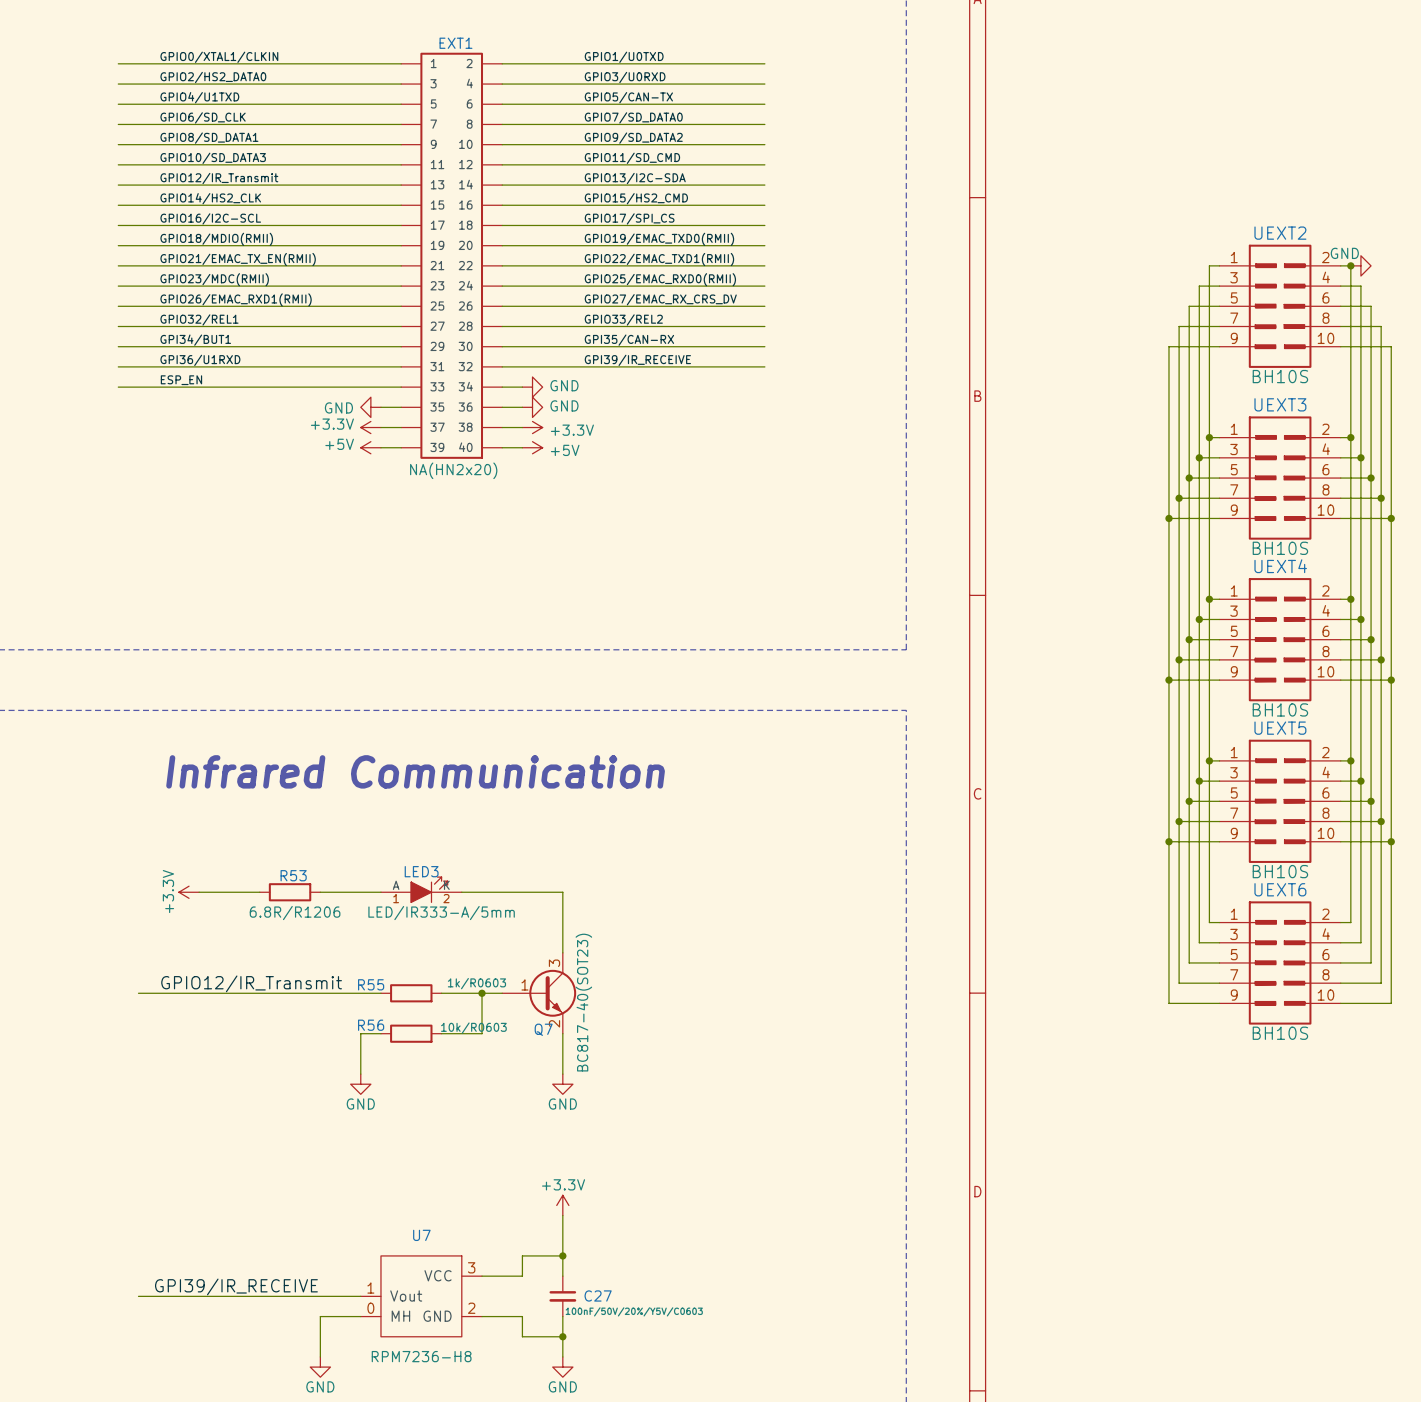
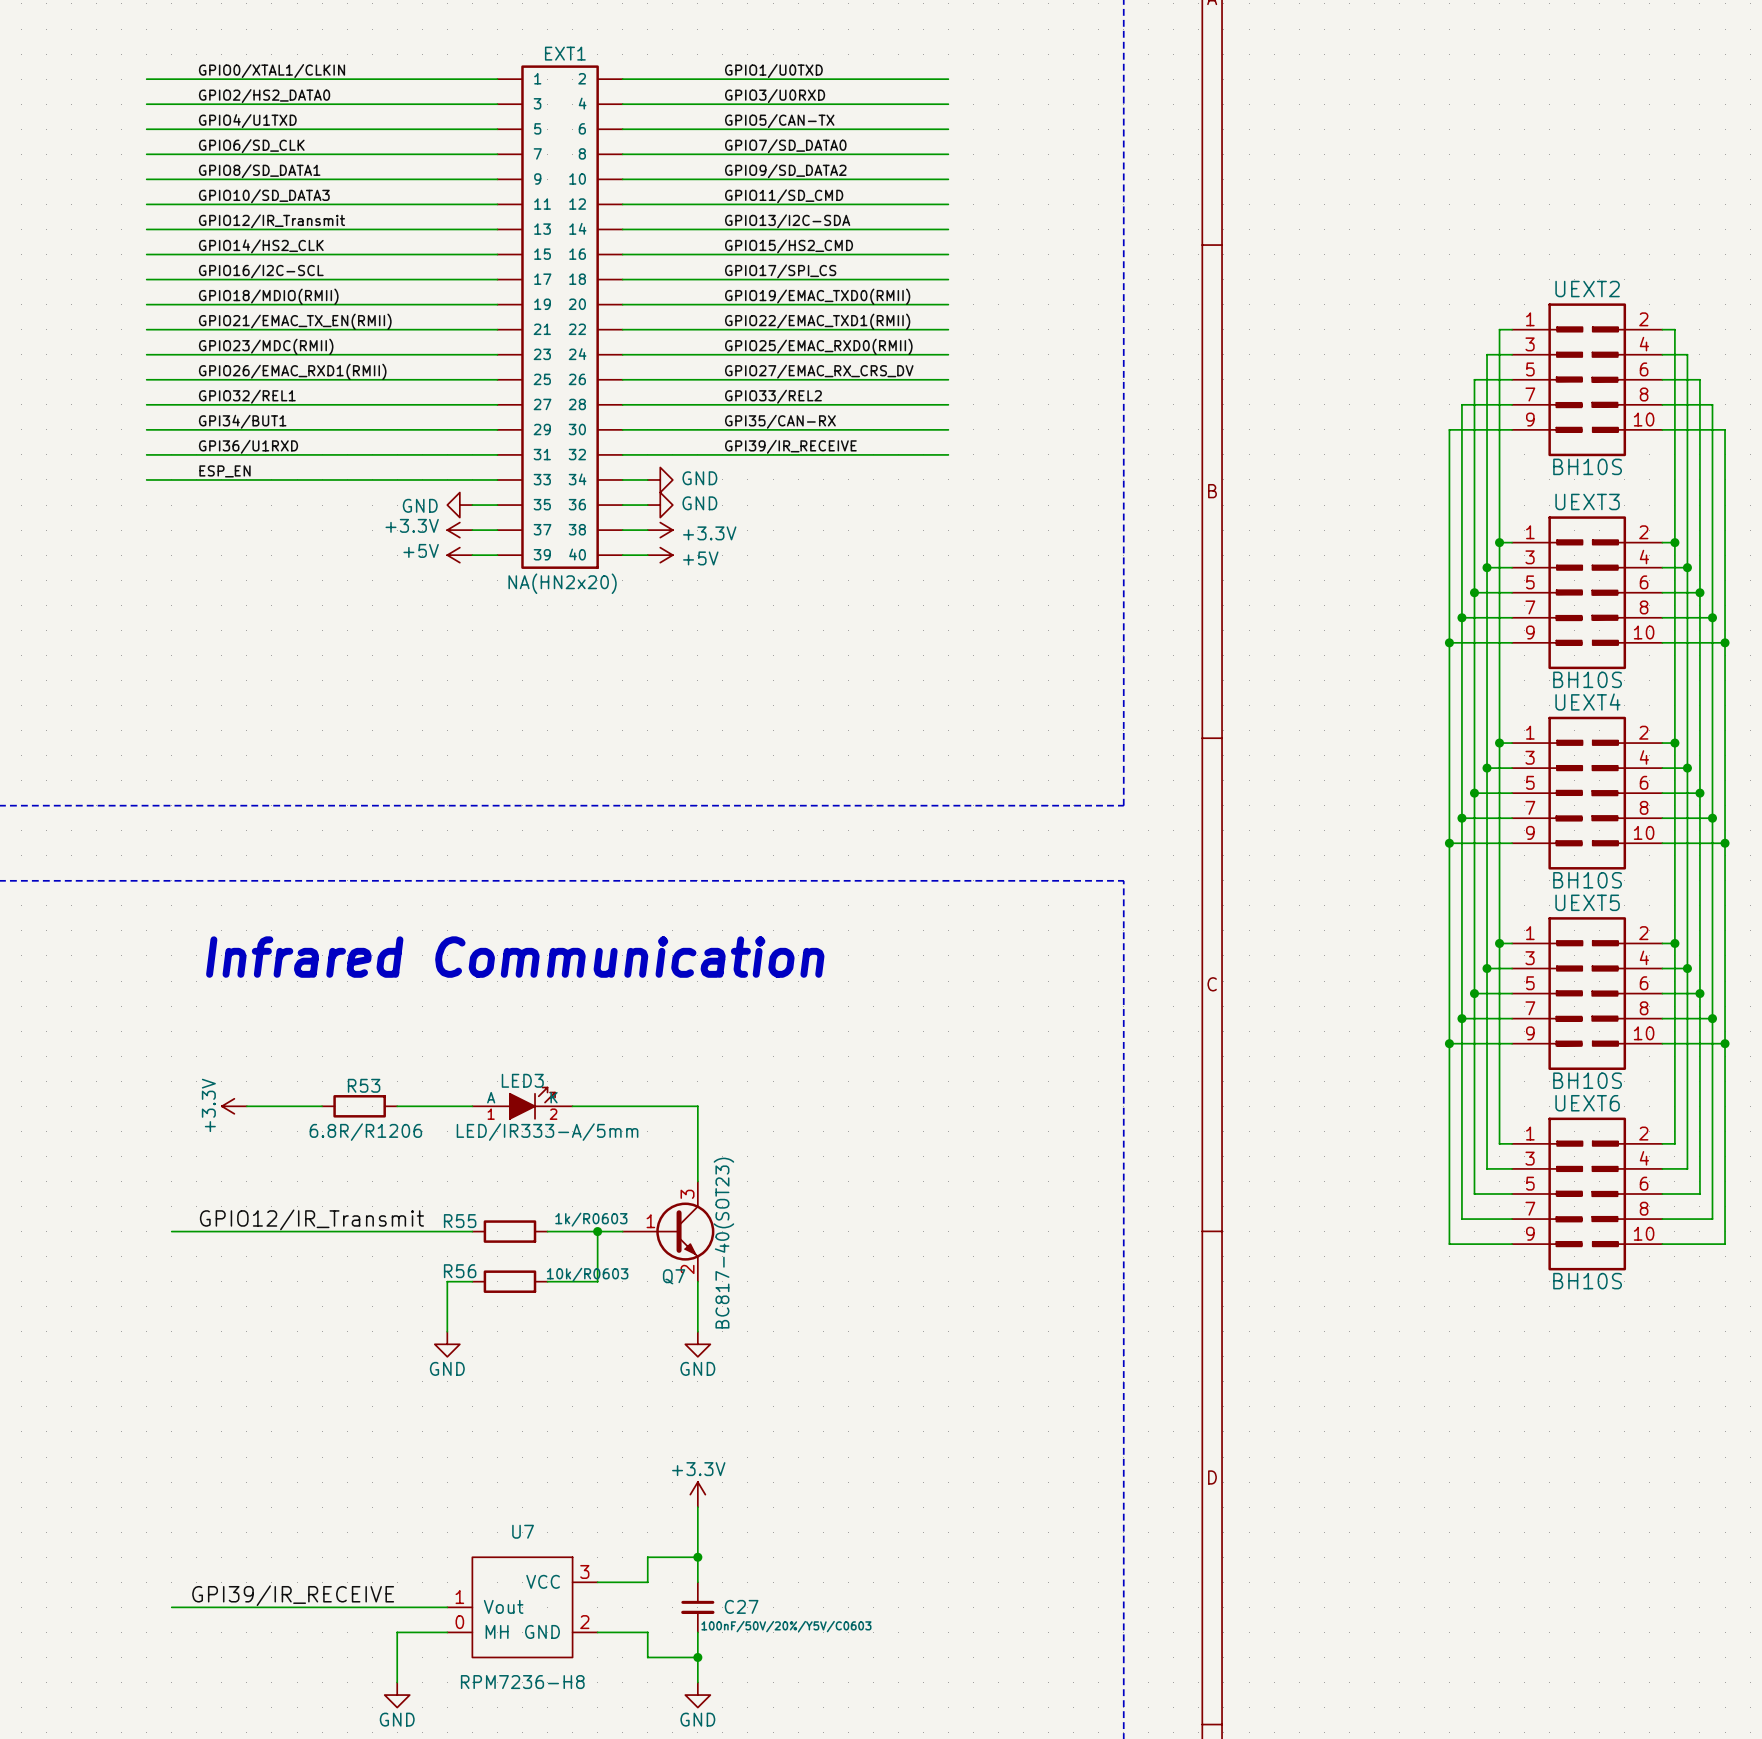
junction: (1350, 265) -> none
power symbol: GND (1360, 265) -> none

